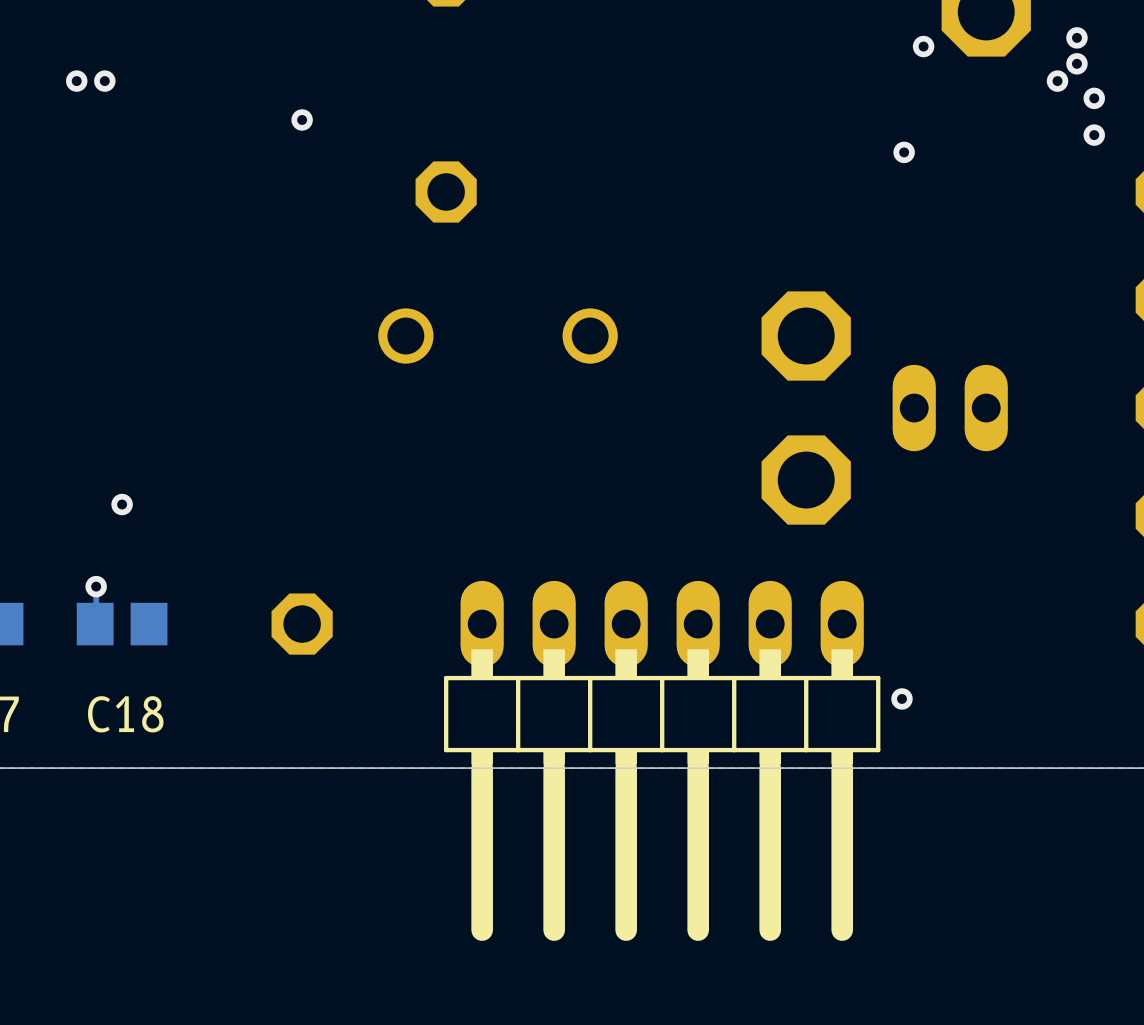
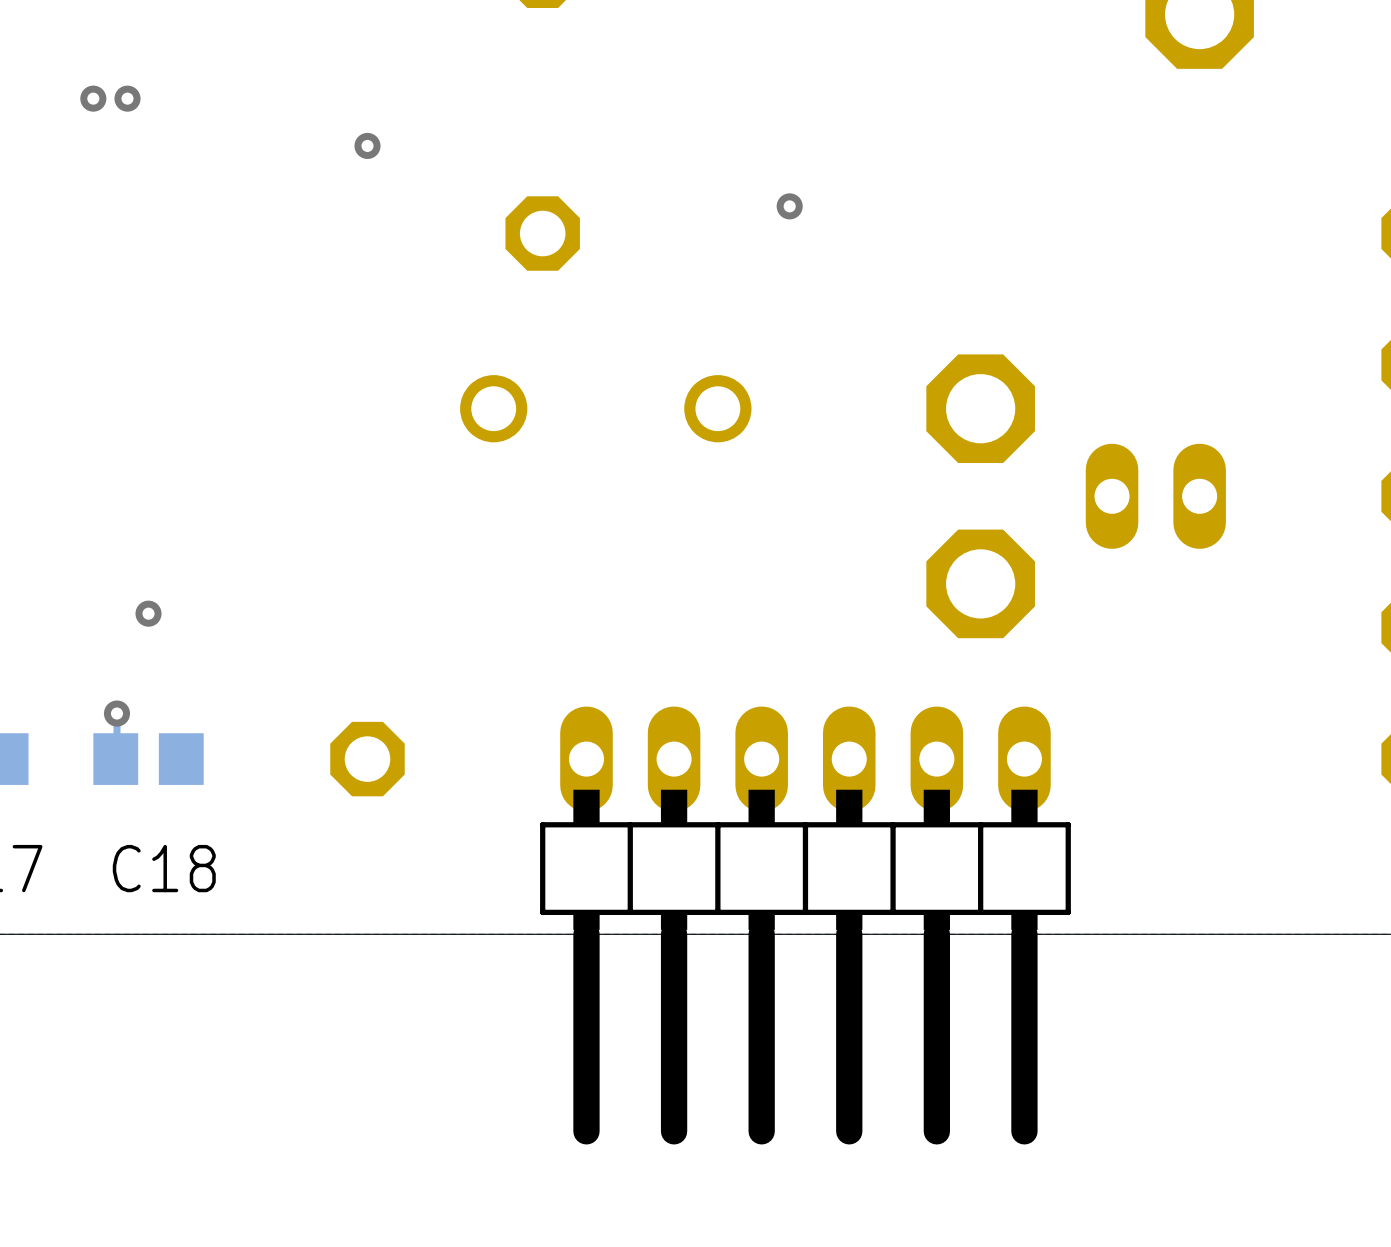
via: (1076, 37) -> none
via: (923, 46) -> none
via: (1076, 63) -> none
via: (1057, 81) -> none
via: (1094, 98) -> none
via: (1094, 135) -> none
via: (904, 152) -> none
via: none -> (789, 206)
via: (901, 698) -> none

